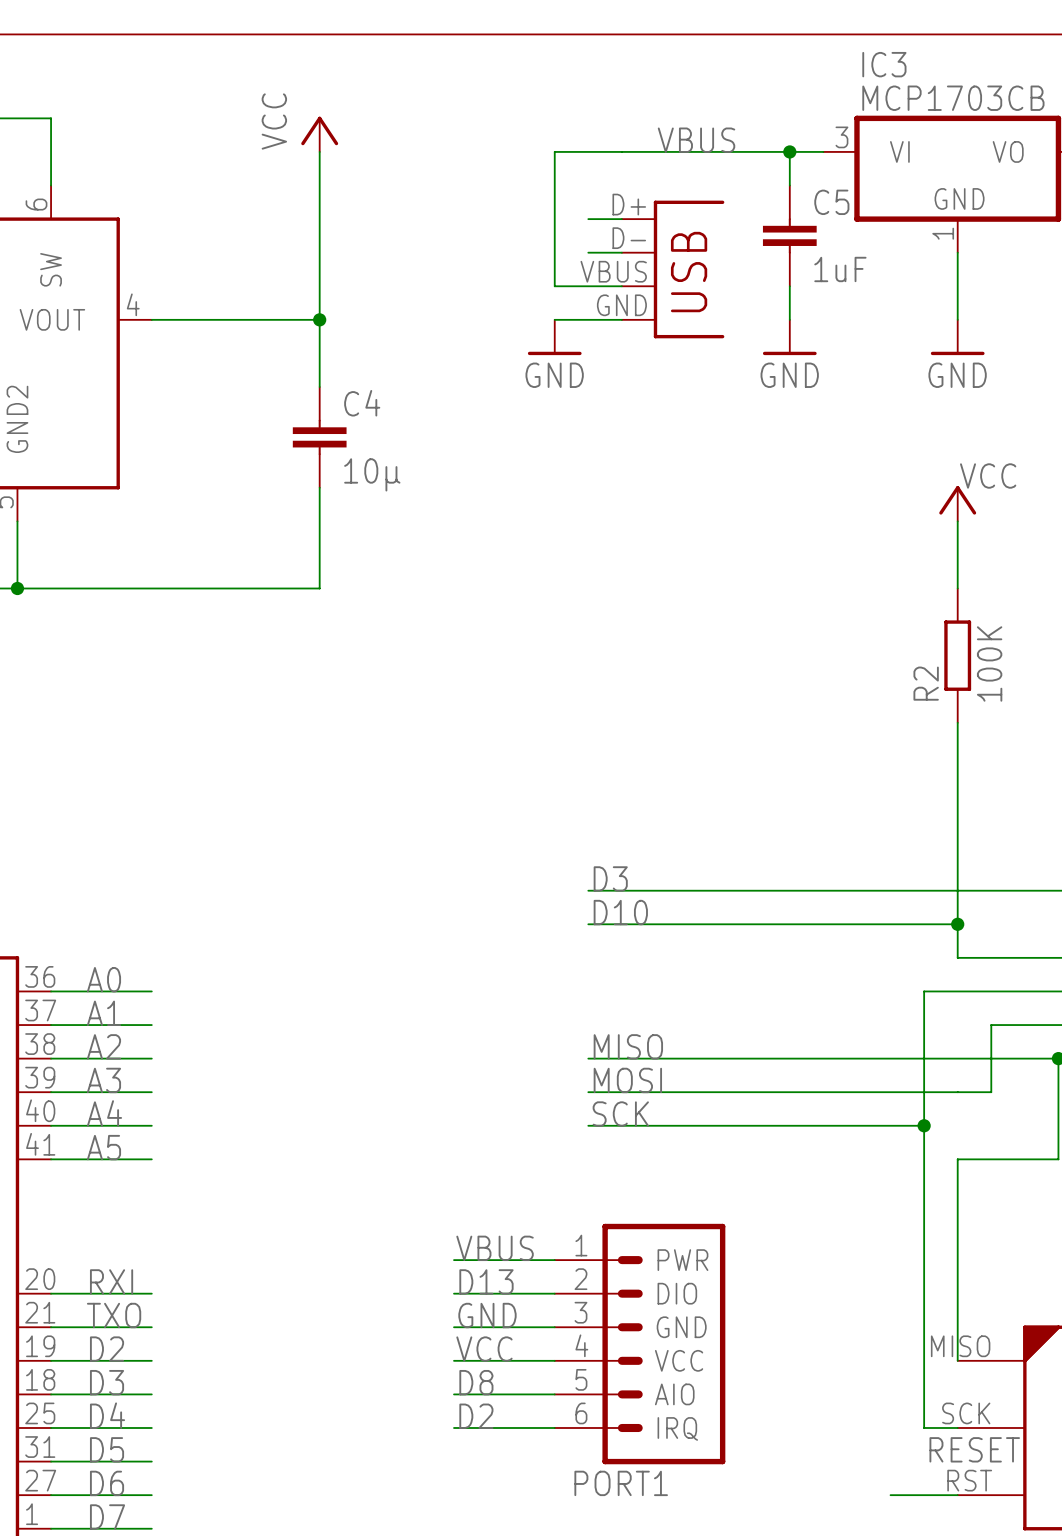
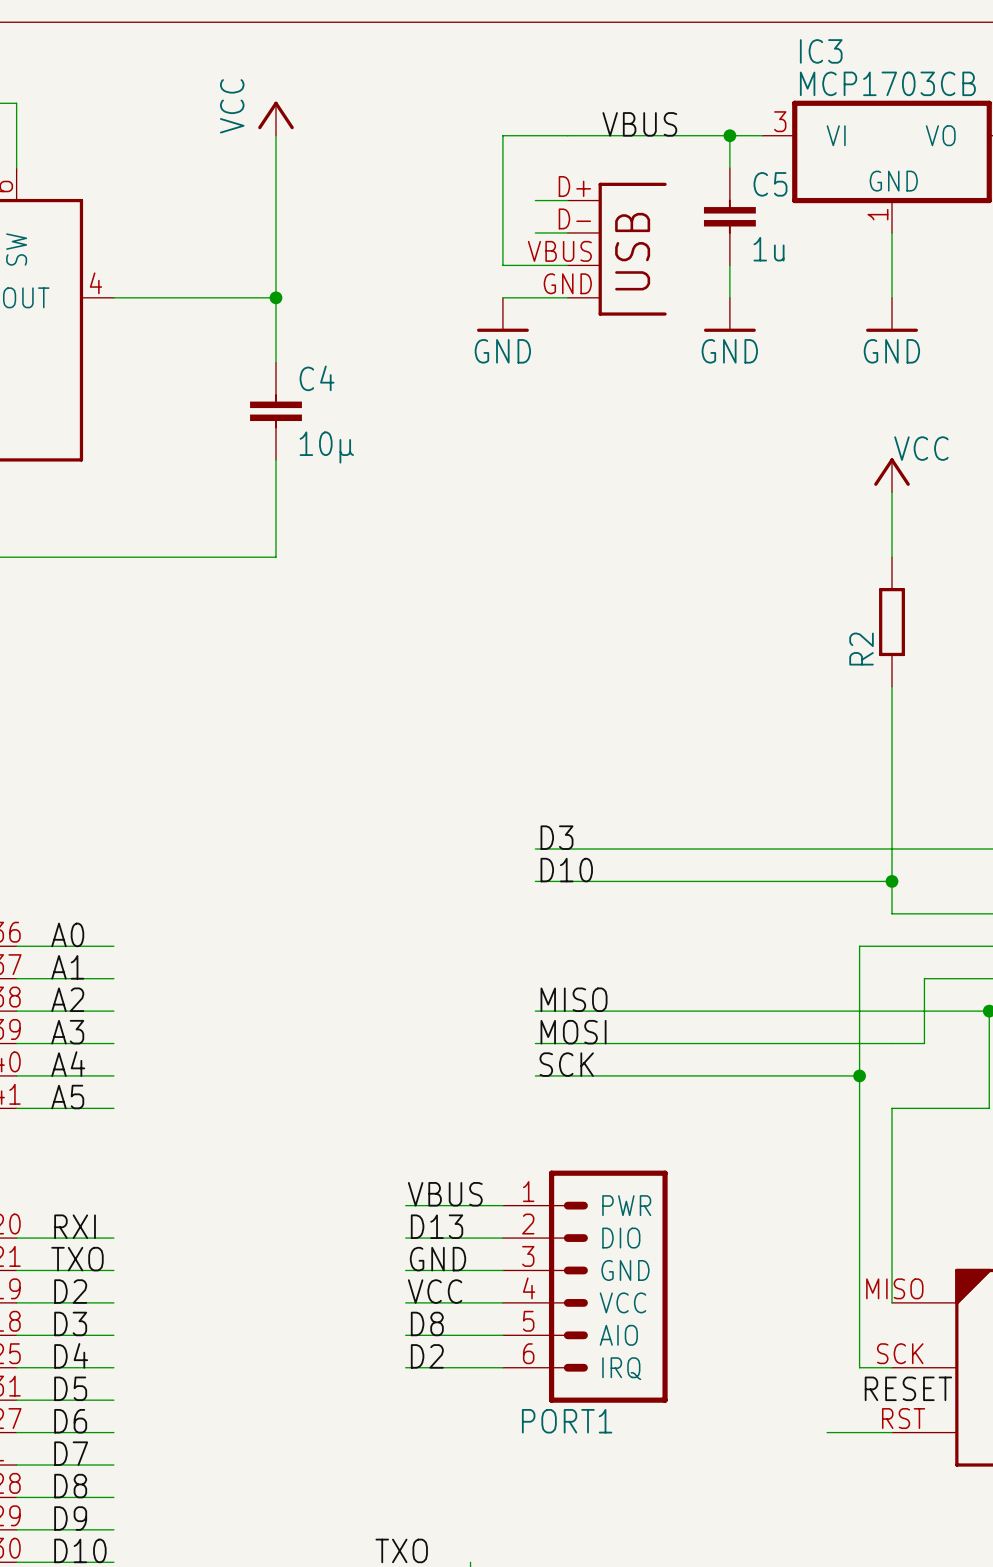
C5 value: 1uF (840, 269) -> 1u (769, 249)
R2 value: 100K (989, 663) -> none

